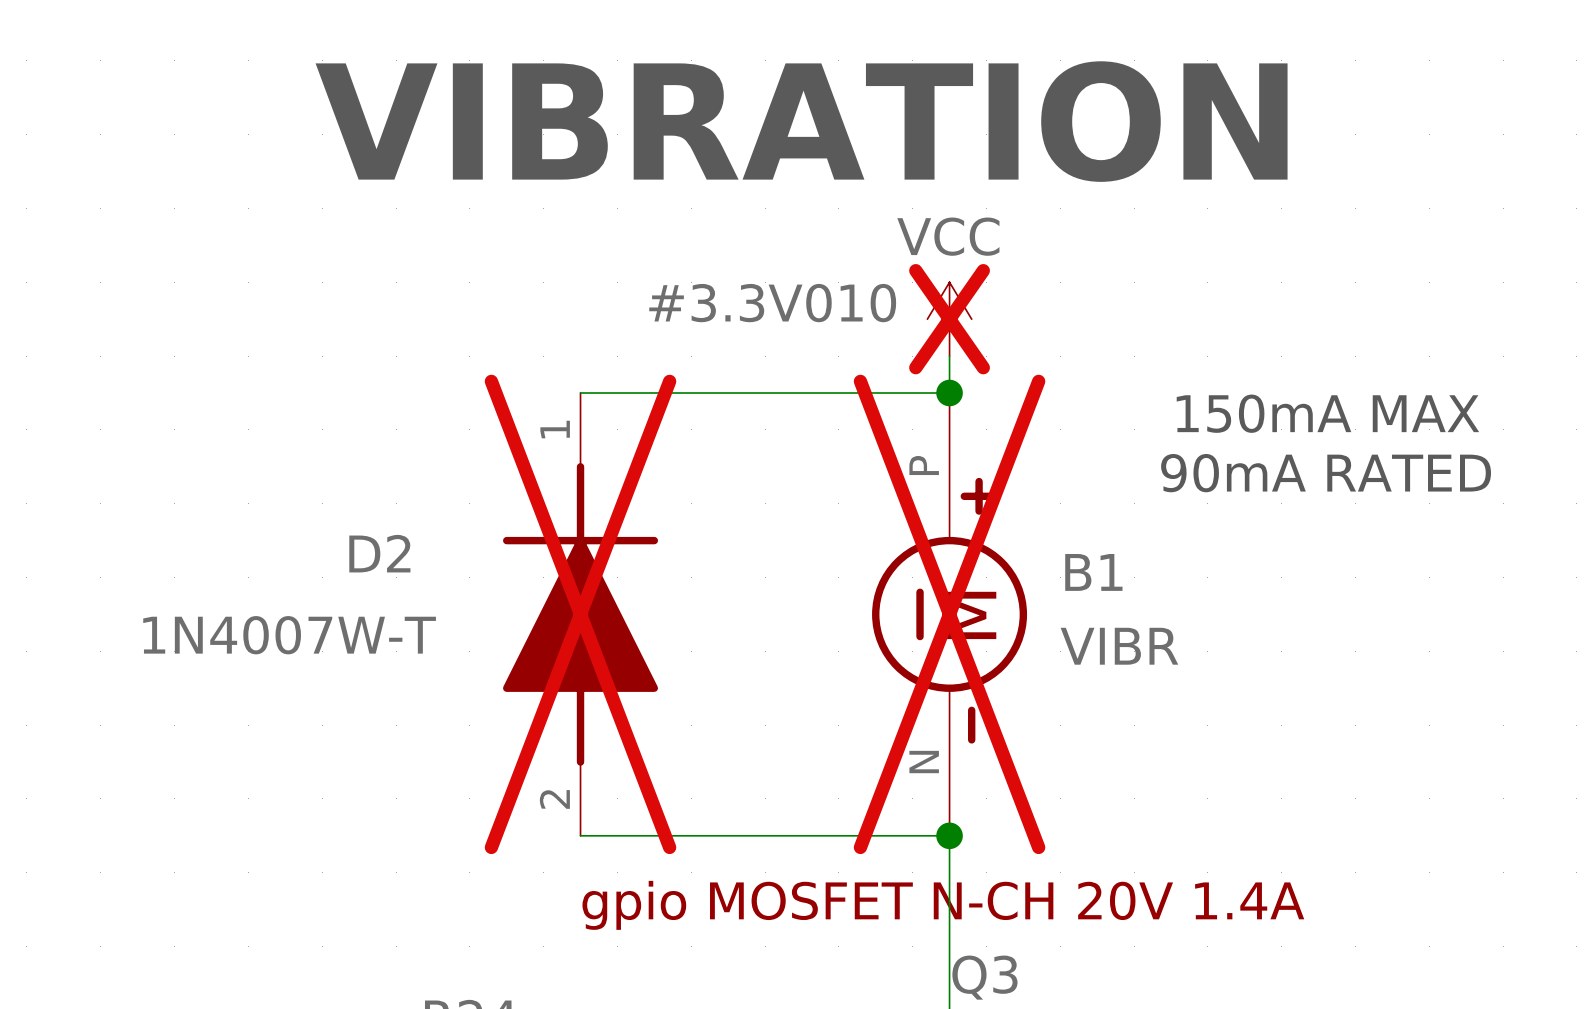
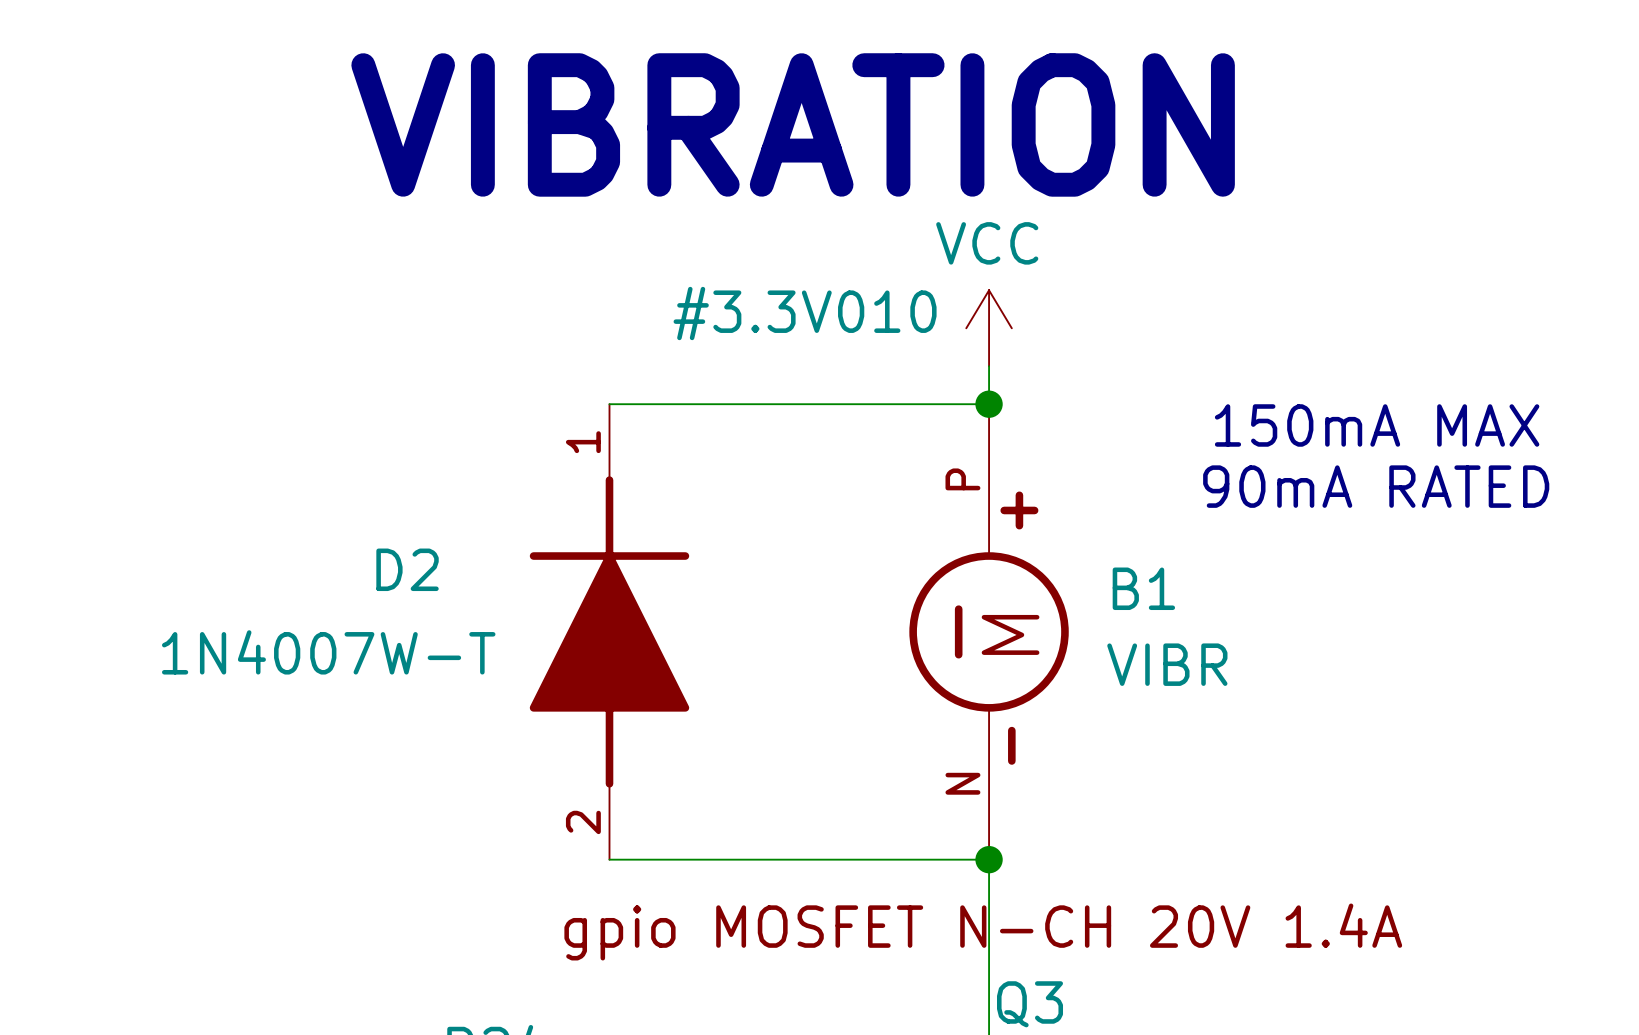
#3.3V010 do-not-place cross: (949, 319) -> none
D2 do-not-place cross: (580, 614) -> none
B1 do-not-place cross: (949, 614) -> none

